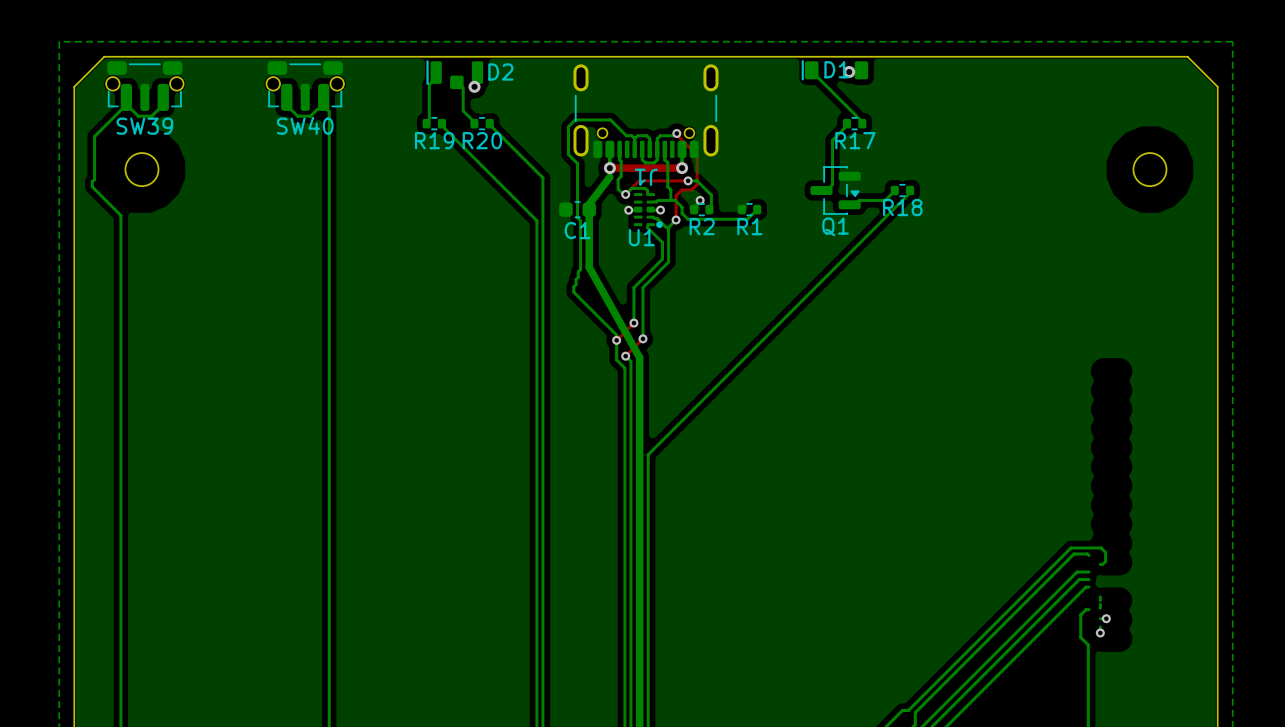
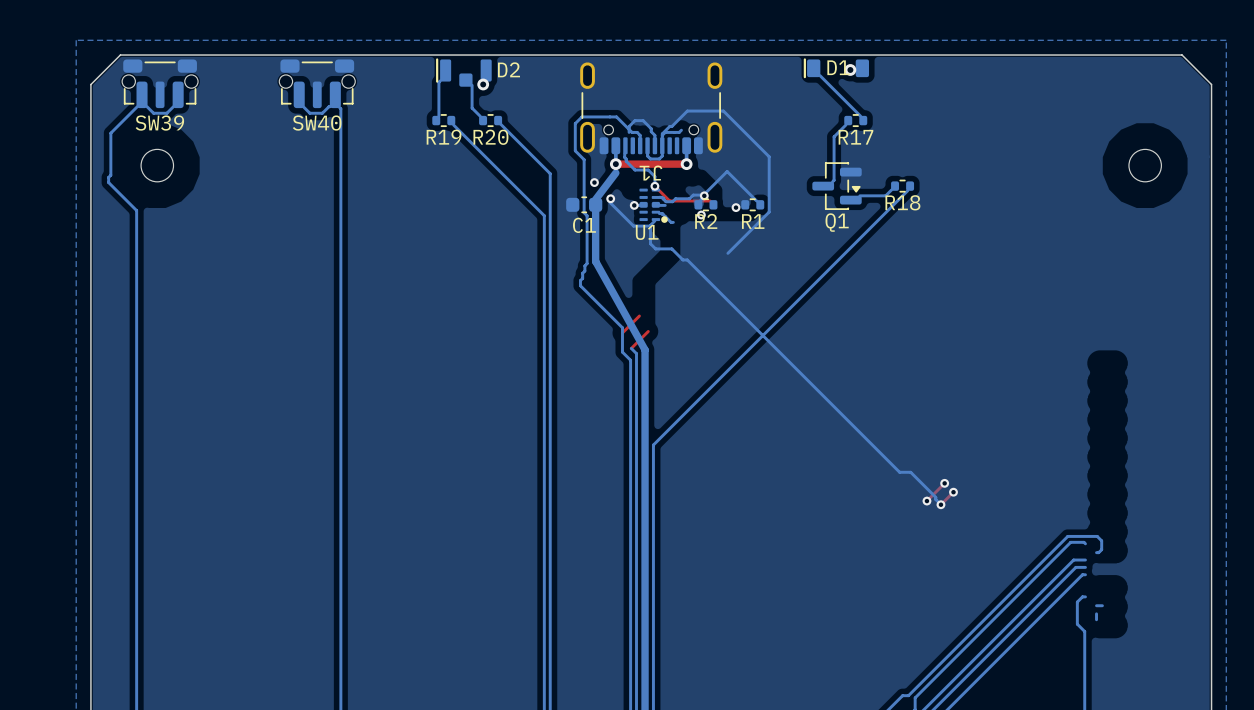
top track: (676, 133) (697, 155) (697, 184) (691, 189) (682, 189) (676, 195) (676, 220) -> none
via: (676, 133) -> none
bottom track: (646, 135) (637, 135) (634, 138) -> (651, 132) (651, 128) (643, 120) (635, 120) (629, 126) (629, 132)
bottom track: none -> (662, 135) (687, 111) (723, 111) (769, 156) (769, 212) (727, 253)
bottom track: none -> (624, 153) (626, 161) (635, 170) (648, 170) (654, 176) (654, 189)
bottom track: (619, 157) (621, 176) (618, 179) (618, 189) (625, 194) (631, 188) (645, 188) (647, 193) -> none
bottom track: (664, 157) (667, 162) (667, 186) (670, 189) (670, 200) -> none
top track: (688, 180) (639, 180) (625, 194) -> none
bottom track: (688, 180) (697, 180) (711, 195) (711, 204) -> none
via: (688, 180) -> none
via: none -> (594, 182)
top track: none -> (654, 186) (669, 200) (710, 200)
via: none -> (654, 186)
via: (625, 194) -> none
bottom track: (656, 201) (675, 200) (682, 207) (682, 213) (688, 219) (747, 219) (753, 213) -> (661, 197) (665, 201) (672, 201) (675, 198) (689, 198) (693, 195) (703, 195) (727, 171) (756, 200)
bottom track: none -> (610, 198) (610, 203) (633, 226) (650, 226)
via: none -> (610, 198)
via: (660, 210) -> none
via: none -> (736, 207)
bottom track: (676, 220) (668, 227) (668, 262) (642, 287) (642, 338) -> none
via: (676, 220) -> none
via: none -> (701, 215)
bottom track: (647, 226) (662, 242) (662, 259) (633, 287) (633, 323) -> none
bottom track: none -> (654, 220) (650, 225) (650, 243) (655, 248) (671, 248) (682, 259) (687, 259) (899, 472) (910, 472) (940, 504)
via: (633, 323) -> none
via: (642, 338) -> none
via: (616, 340) -> none
via: (625, 356) -> none
top track: none -> (944, 483) (926, 501)
via: none -> (944, 483)
top track: none -> (953, 492) (940, 504)
via: none -> (953, 492)
via: none -> (926, 501)
via: none -> (940, 504)
bottom track: (1100, 596) (1100, 600) -> none
bottom track: (1100, 604) (1100, 608) -> none
via: (1106, 618) -> none
via: (1100, 632) -> none

